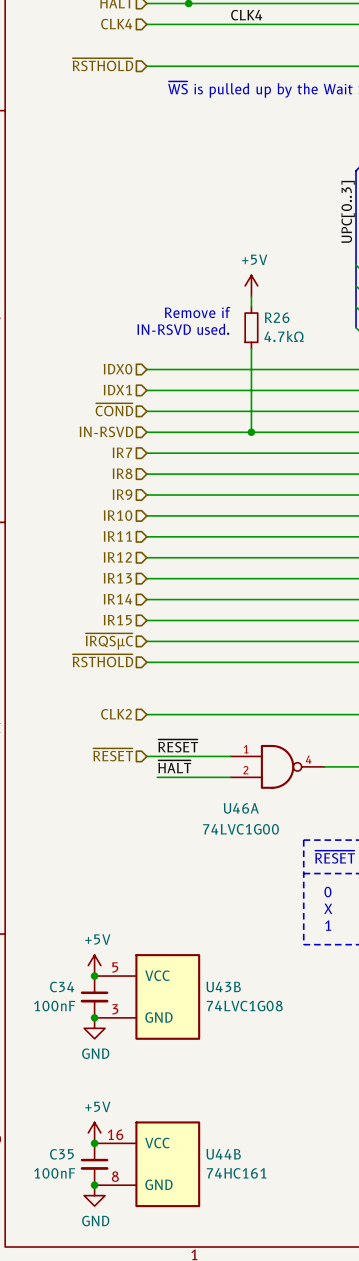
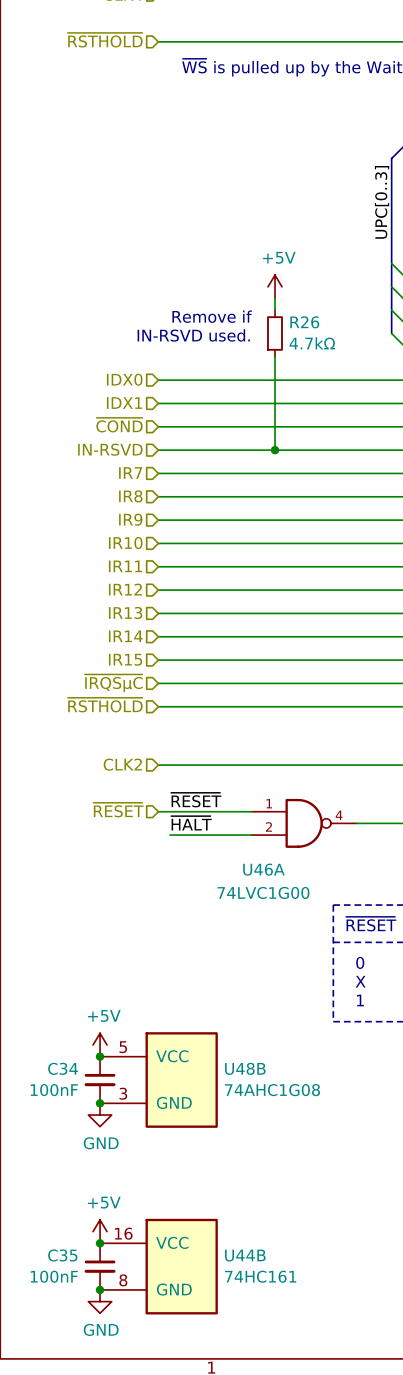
U43B name: U43B (223, 987) -> U48B (245, 1068)
U43B value: 74LVC1G08 (244, 1006) -> 74AHC1G08 (272, 1090)

